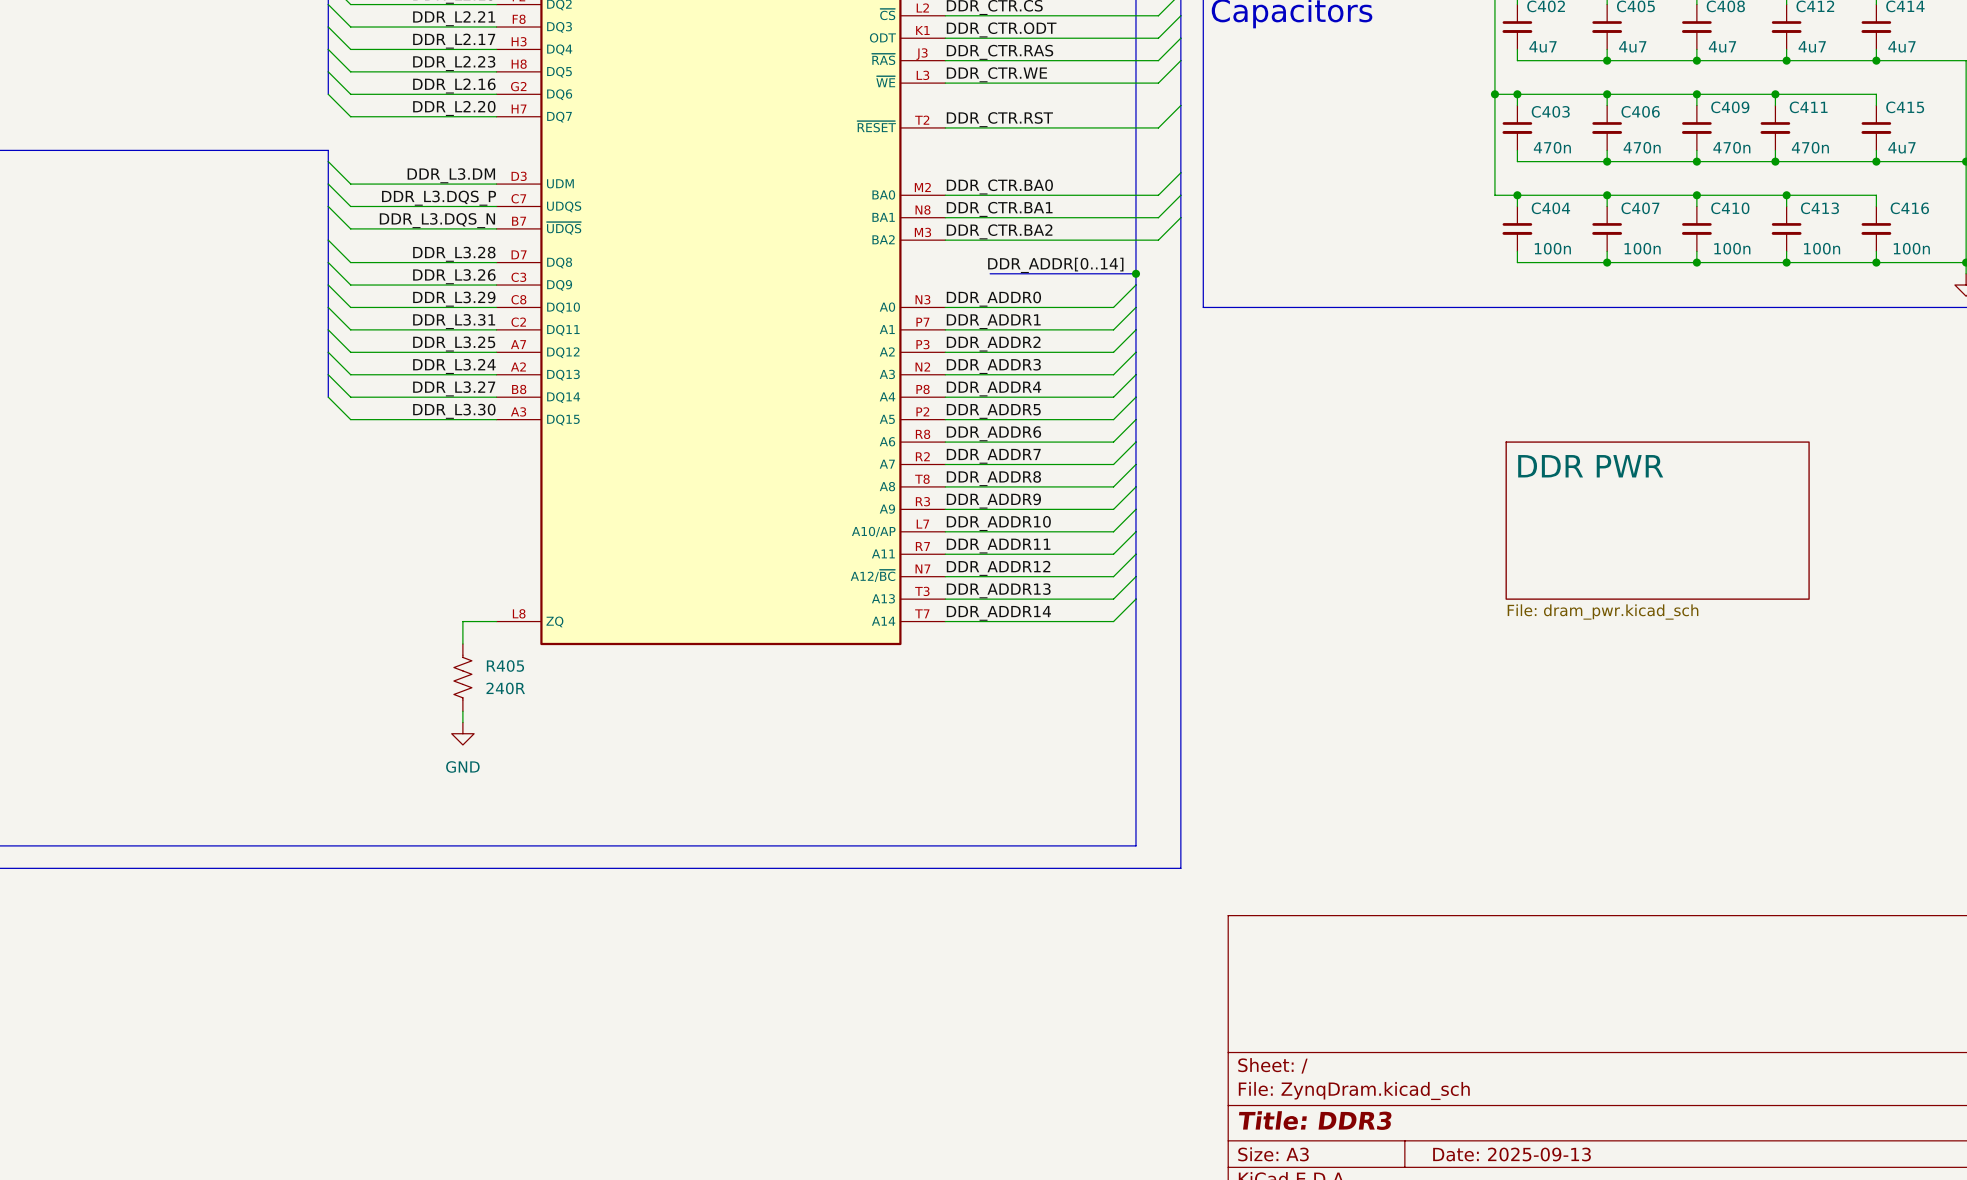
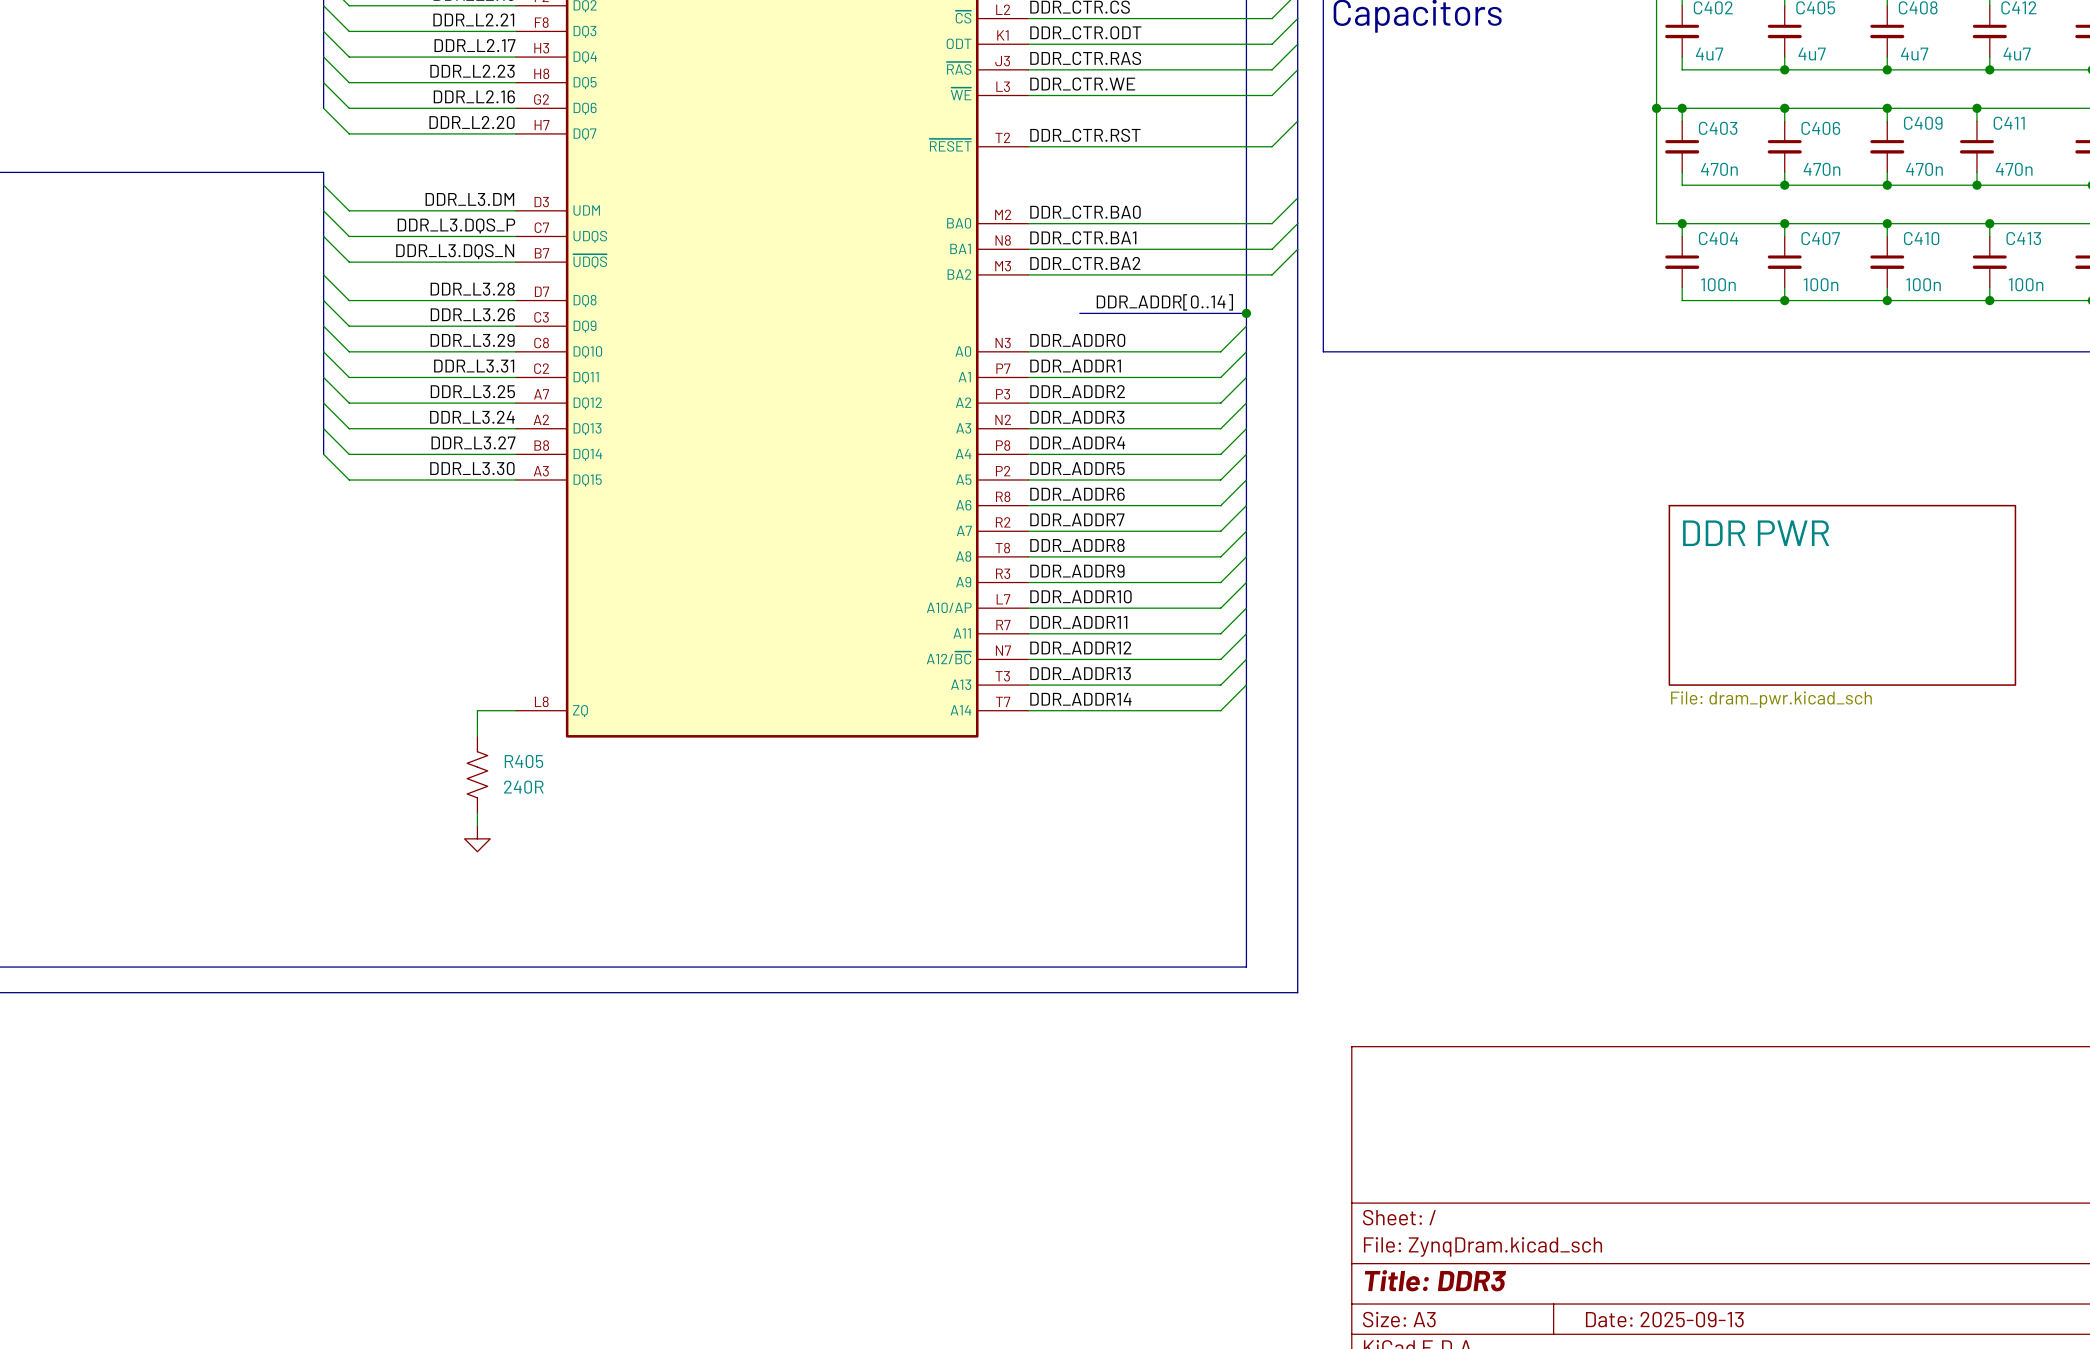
power symbol text: GND (462, 766) -> none

